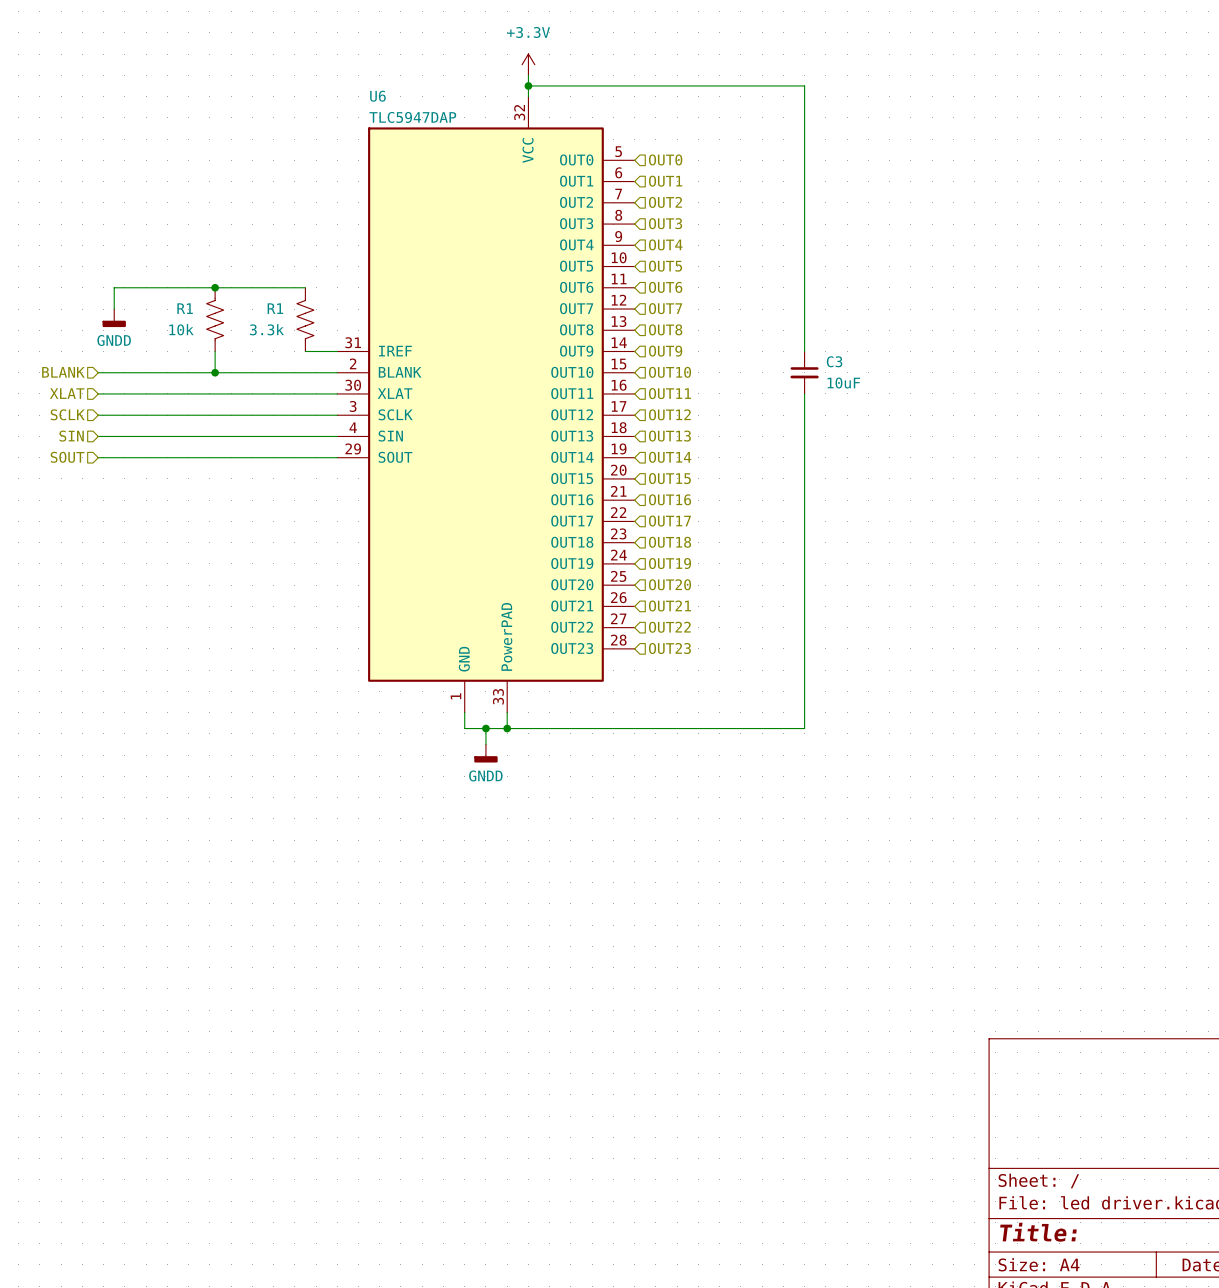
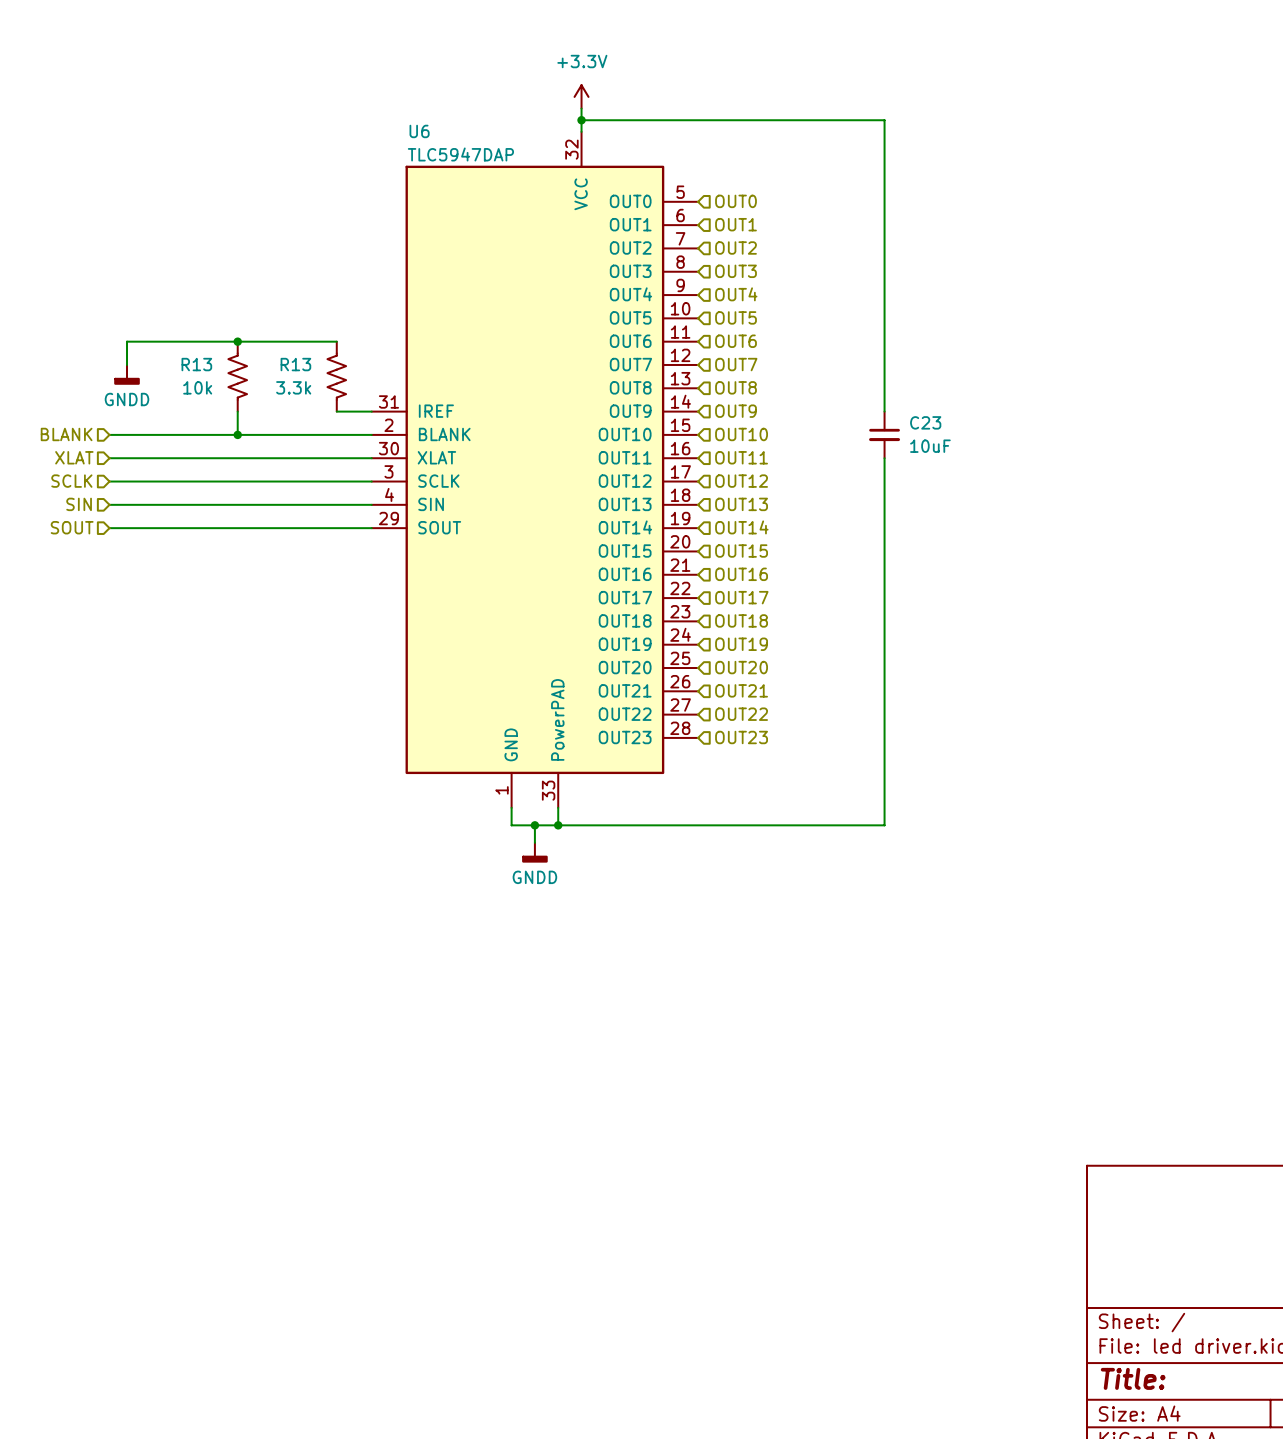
R1 name: R1 (185, 308) -> R13 (196, 364)
R1 name: R1 (275, 308) -> R13 (295, 364)
C3 name: C3 (834, 361) -> C23 (925, 422)

